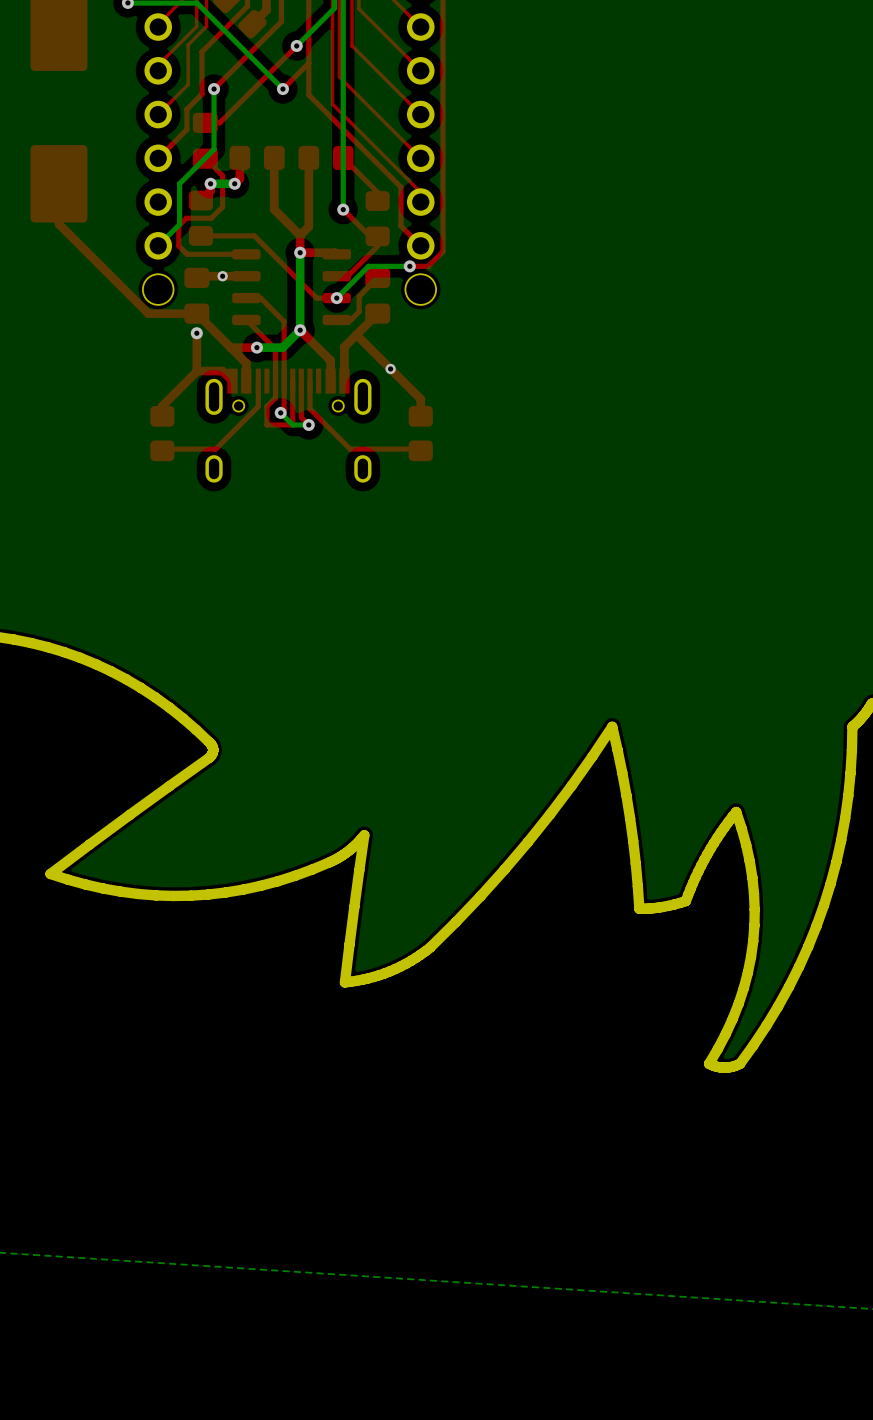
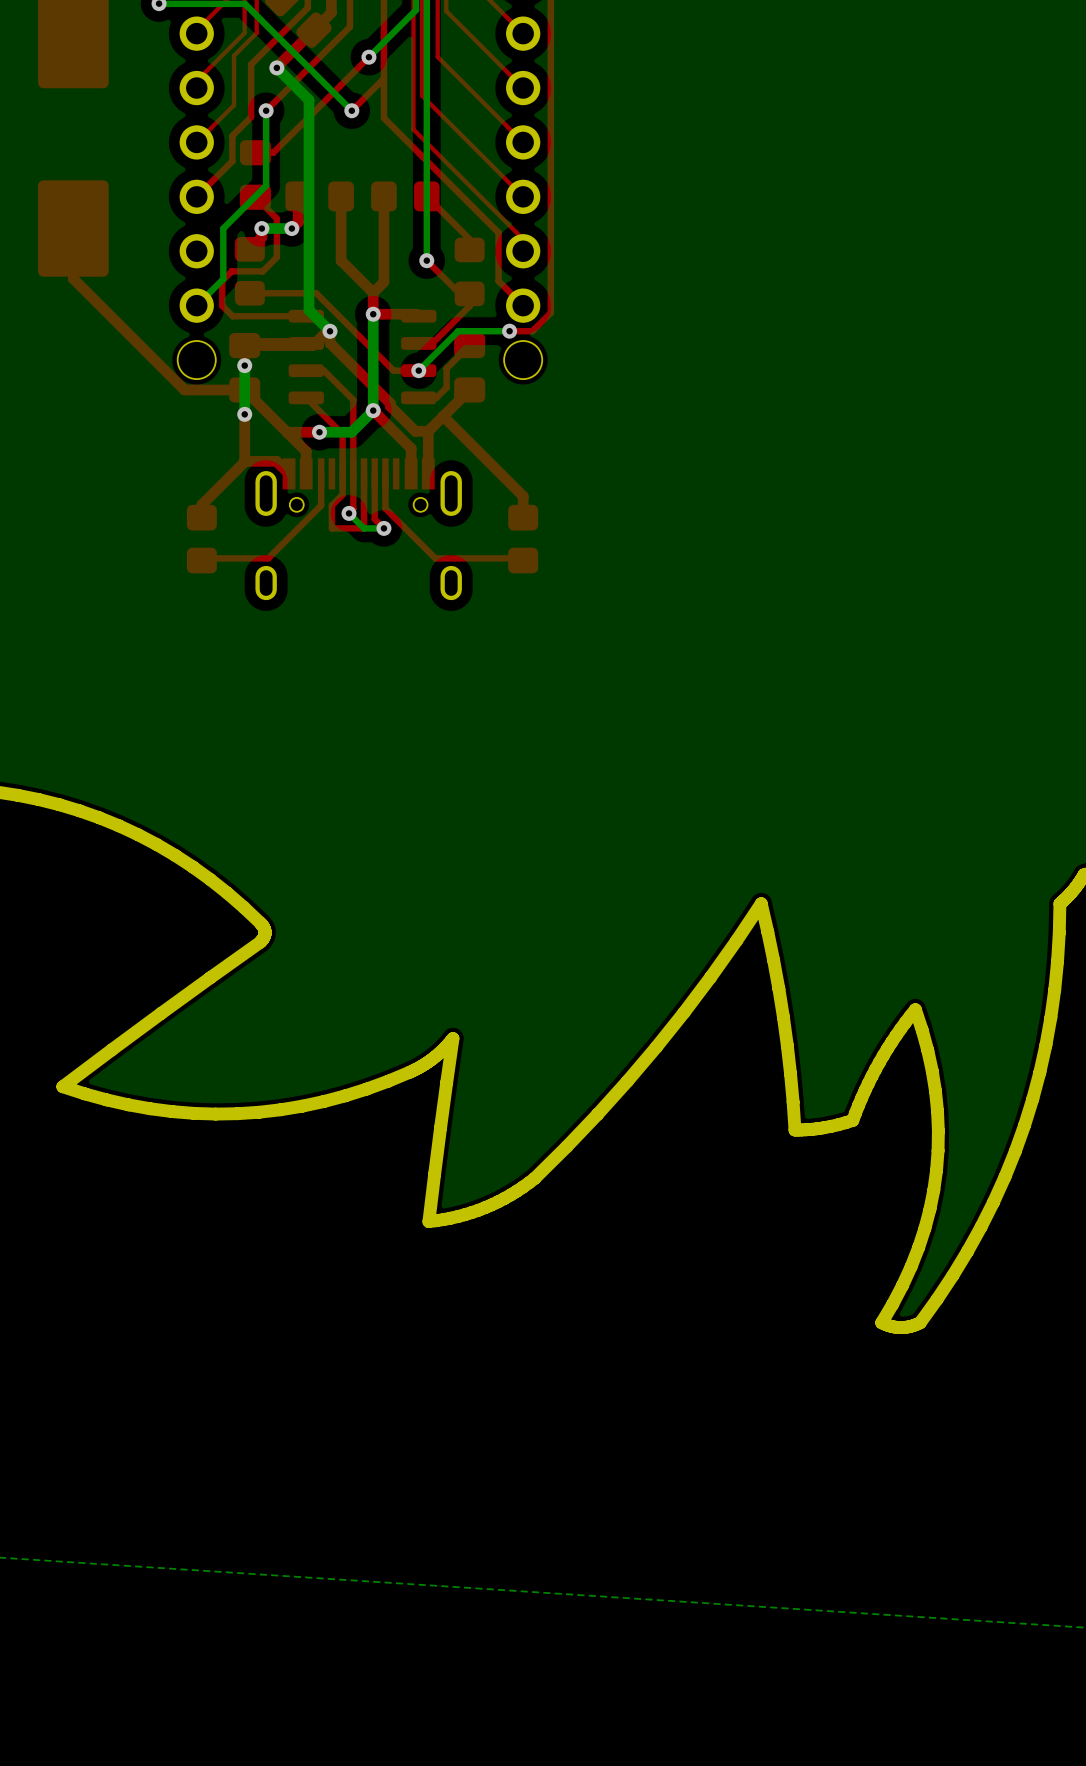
top track: none -> (313, 30) (276, 67)
bottom track: none -> (276, 67) (308, 100) (308, 310) (330, 331)
via: none -> (276, 67)
via: none -> (330, 331)
via: (222, 276) -> none
top track: none -> (244, 365) (244, 345) (312, 345) (327, 331) (330, 331) (330, 343) (390, 403) (390, 406) (415, 431) (428, 431)
bottom track: none -> (244, 365) (244, 414)
via: none -> (244, 365)
via: (390, 368) -> none

